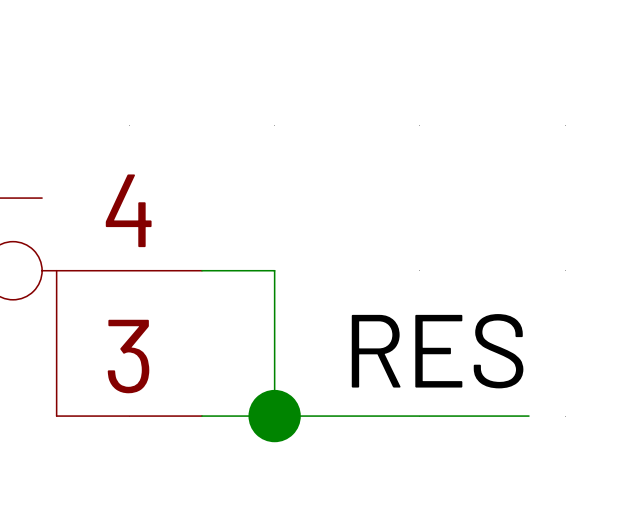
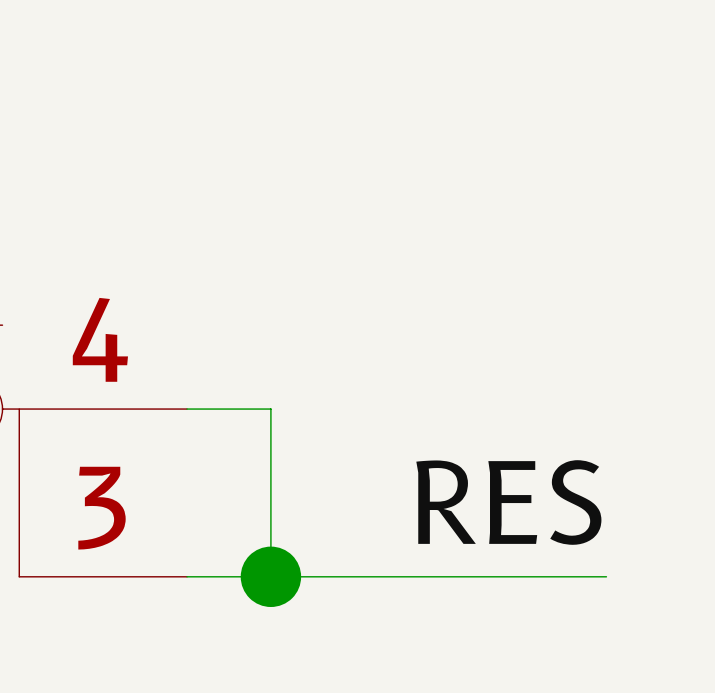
label position: RES (437, 351) -> RES (508, 502)
wire: none -> (564, 576) (606, 576)

